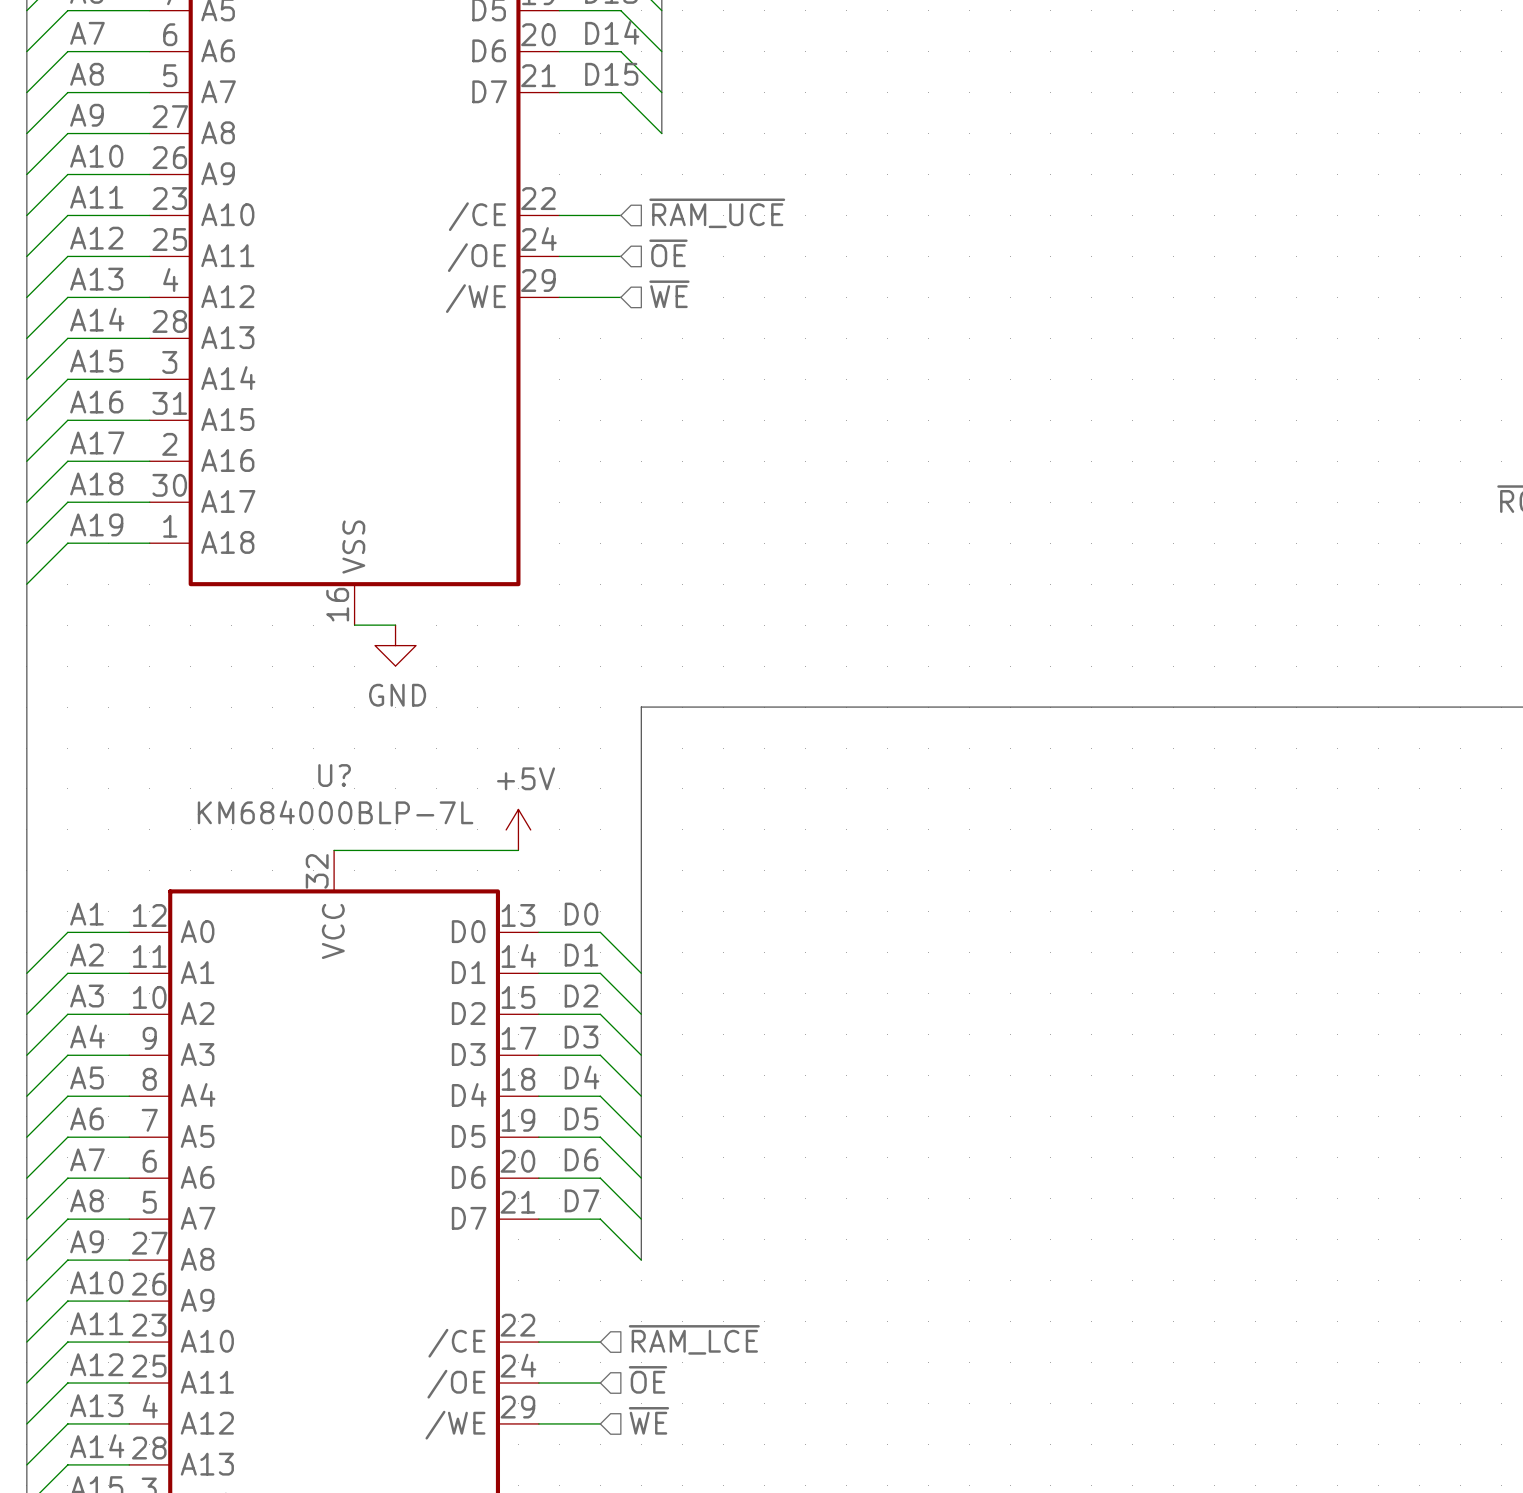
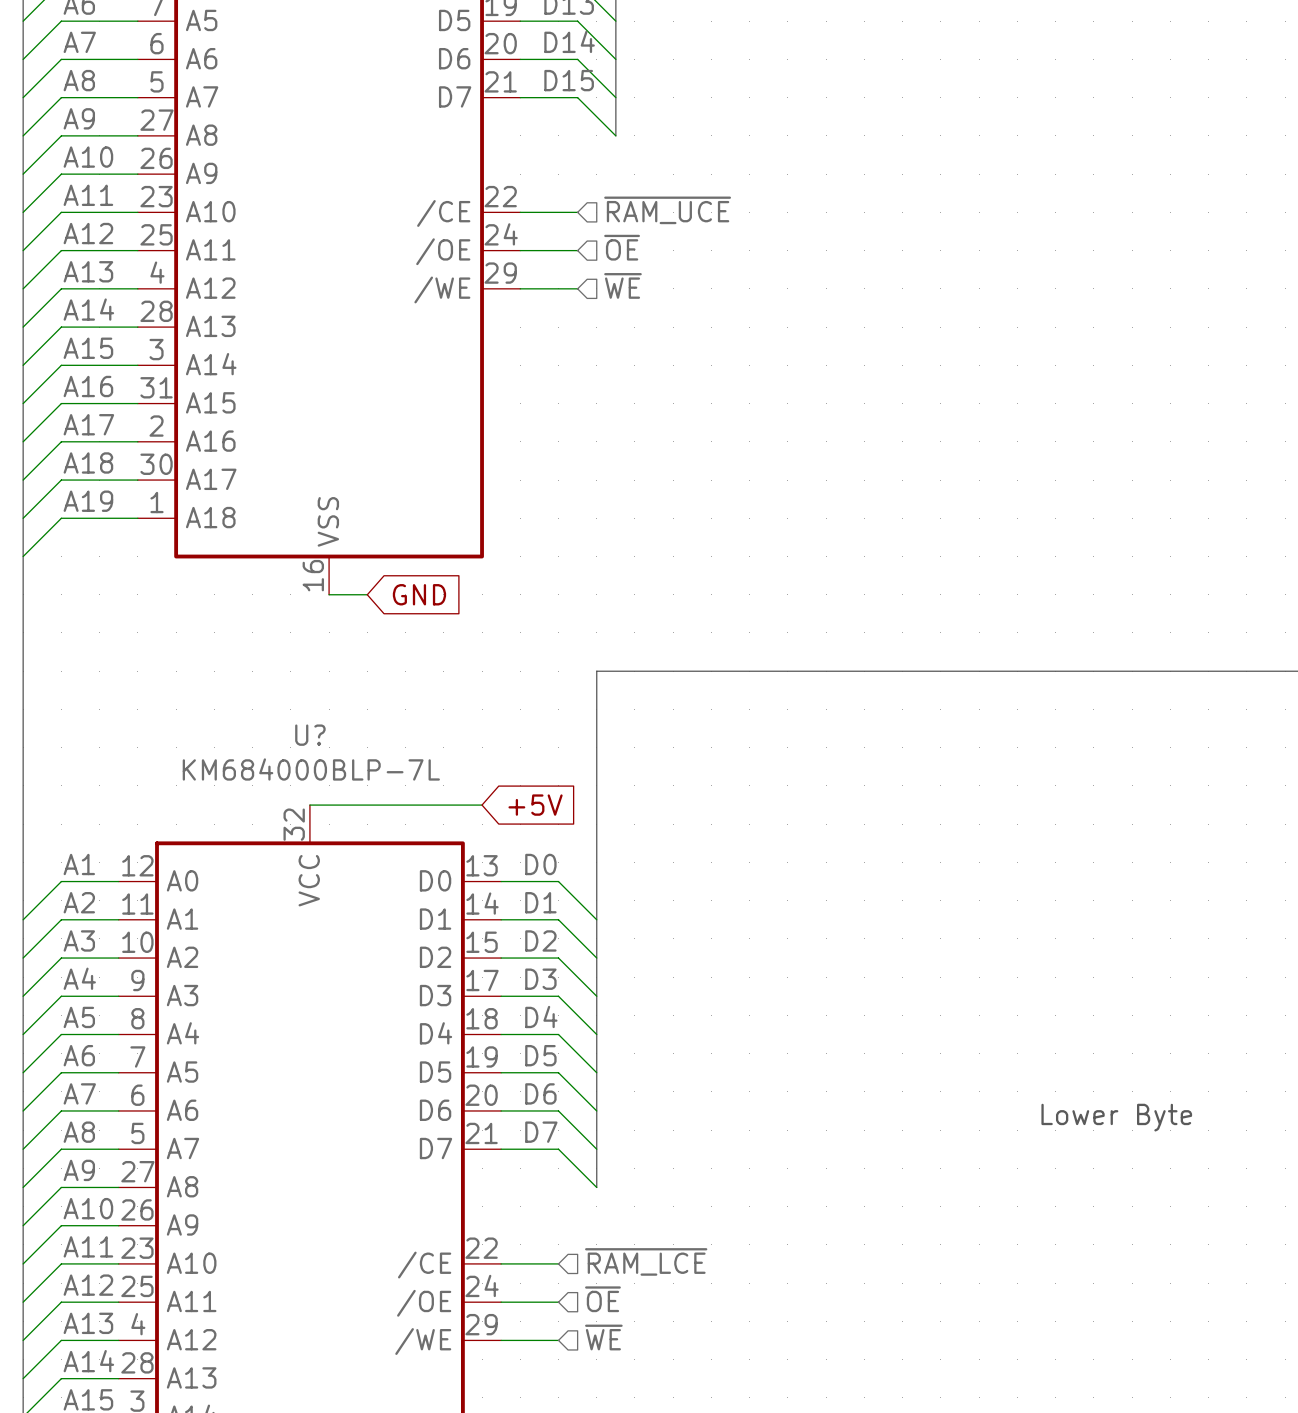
global label: none -> GND (419, 594)
power symbol: GND (395, 645) -> none
power symbol: +5V (518, 829) -> none
global label: none -> +5V (535, 805)
text: none -> Lower Byte (1116, 1117)

